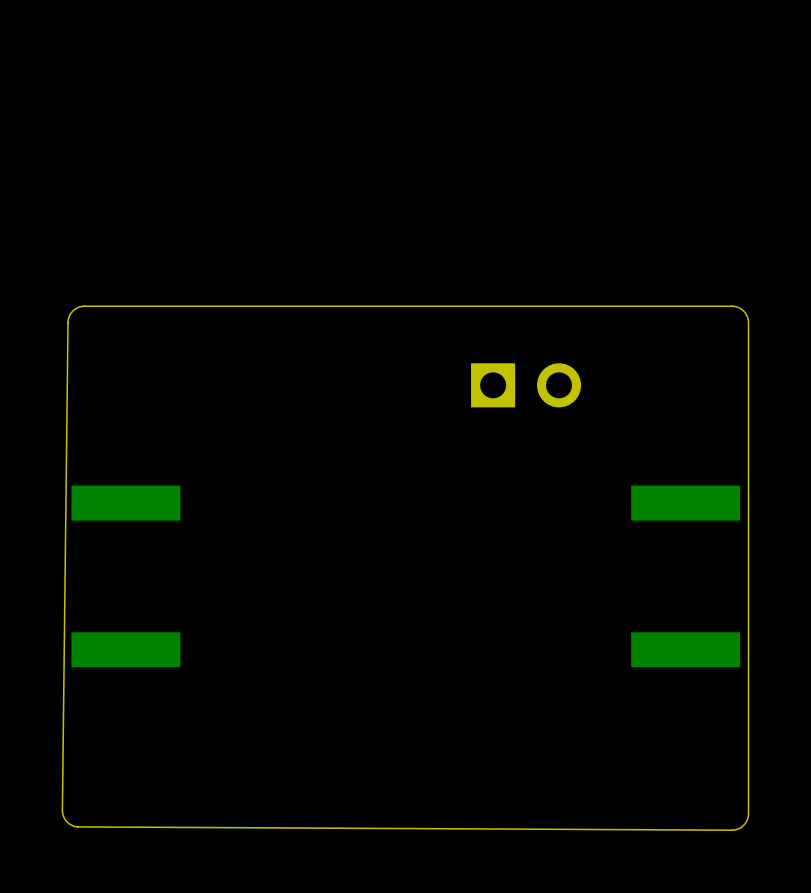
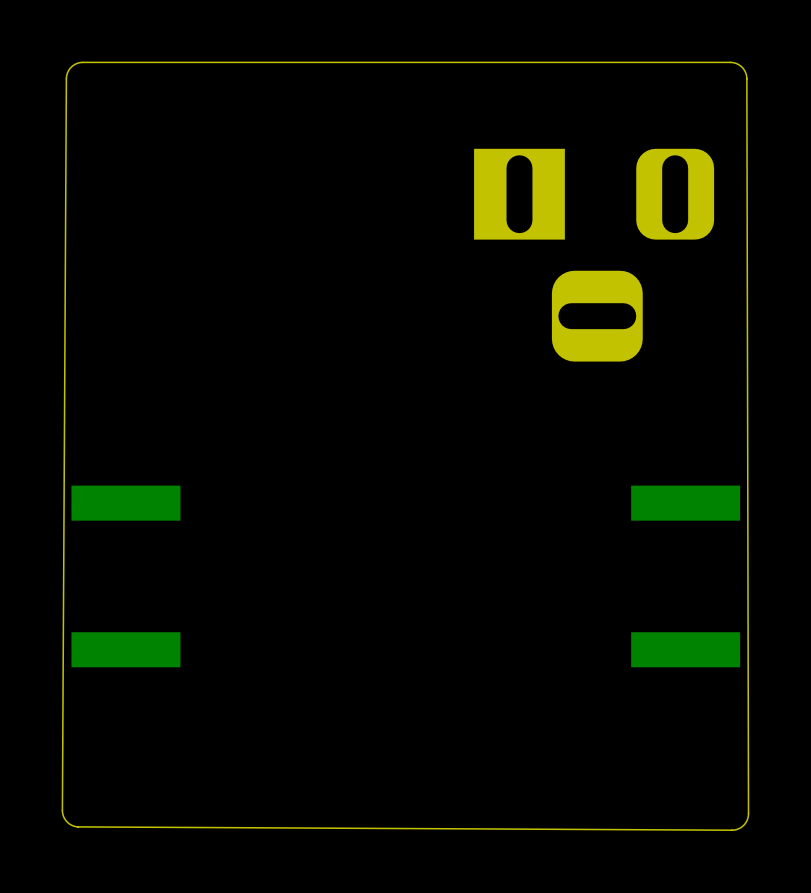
part: none -> (594, 255)
part: (526, 385) -> none
board edge: (62, 810) (68, 322) (69, 316) (74, 309) (84, 306) (732, 306) (743, 311) (748, 322) (748, 813) -> (62, 810) (66, 78) (71, 67) (82, 62) (730, 62) (742, 67) (746, 78) (748, 813)

